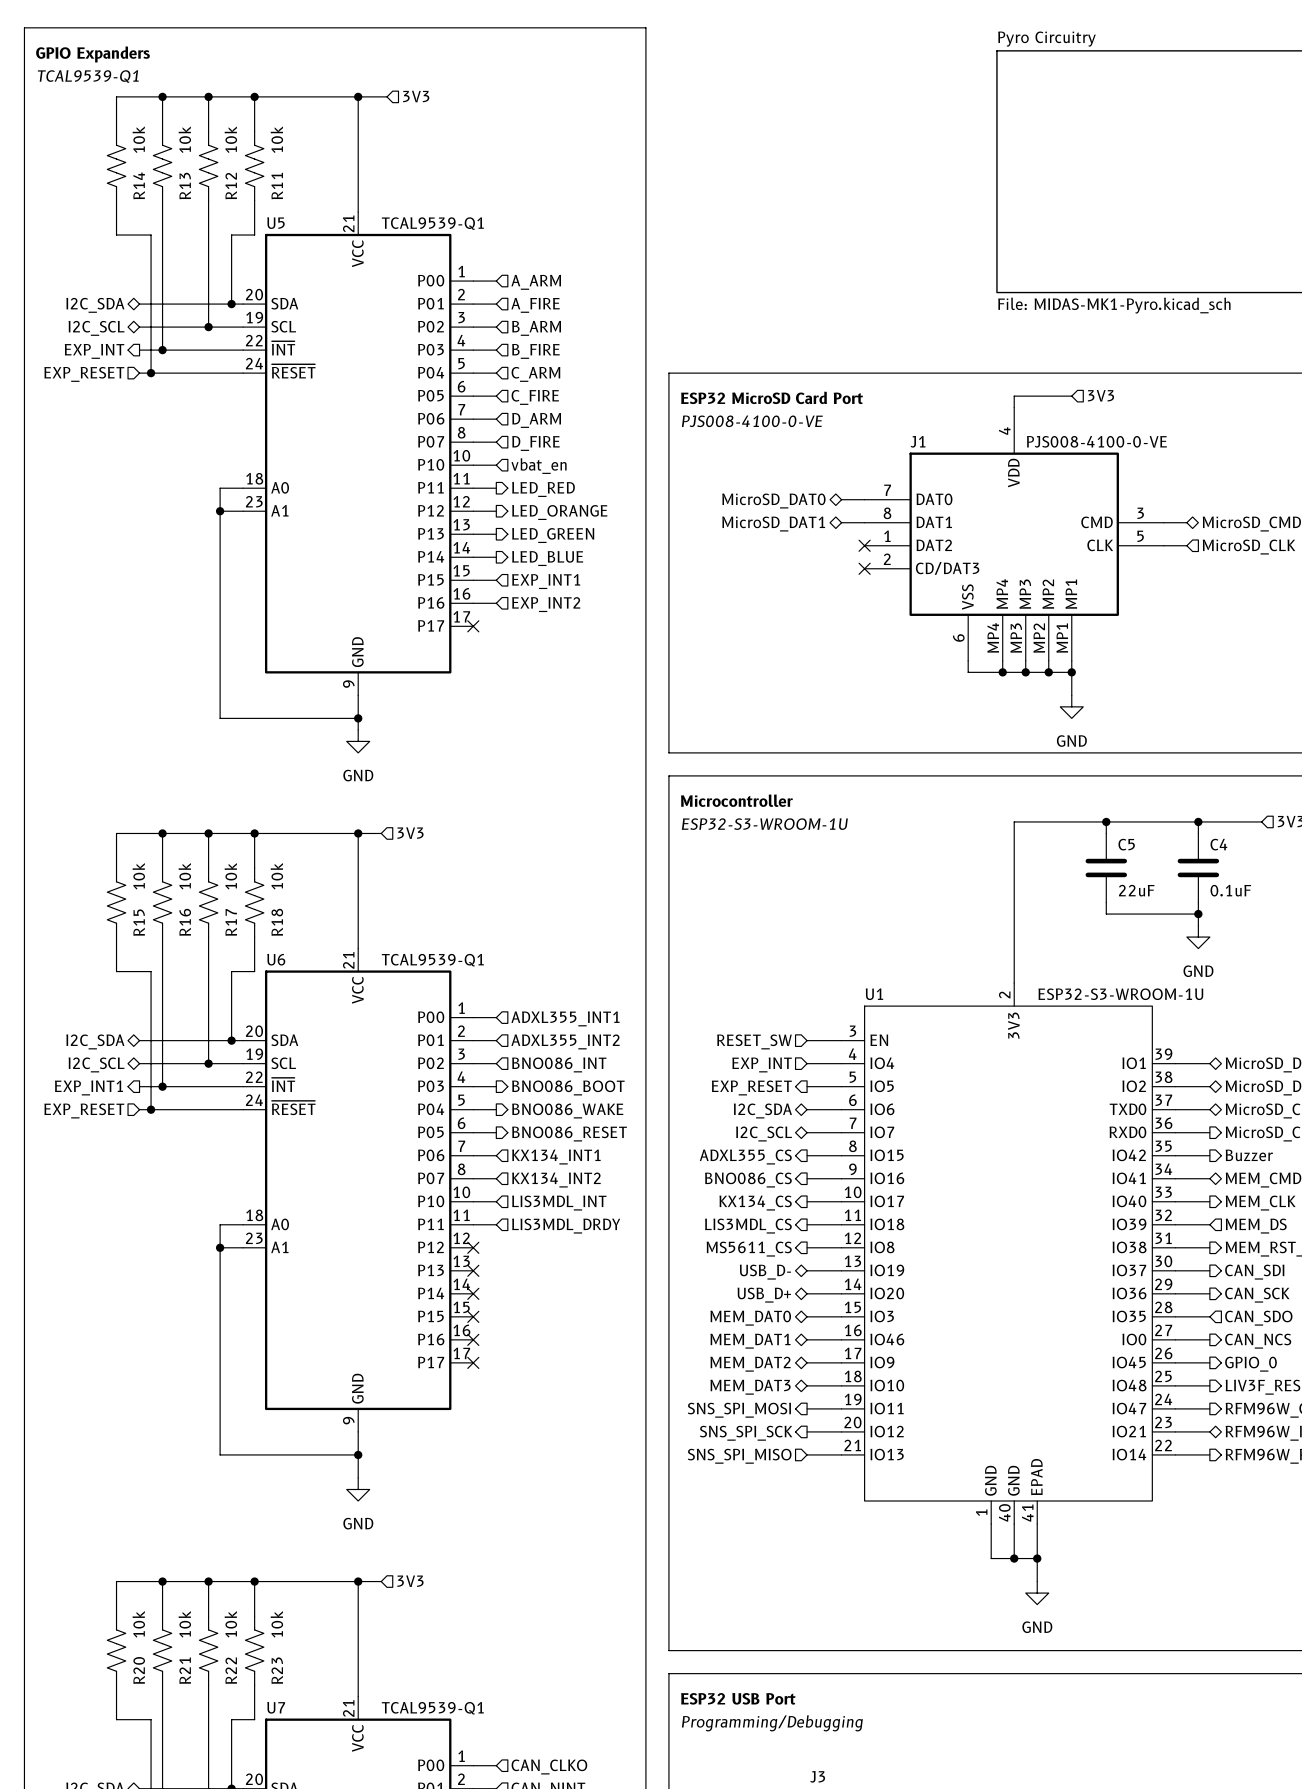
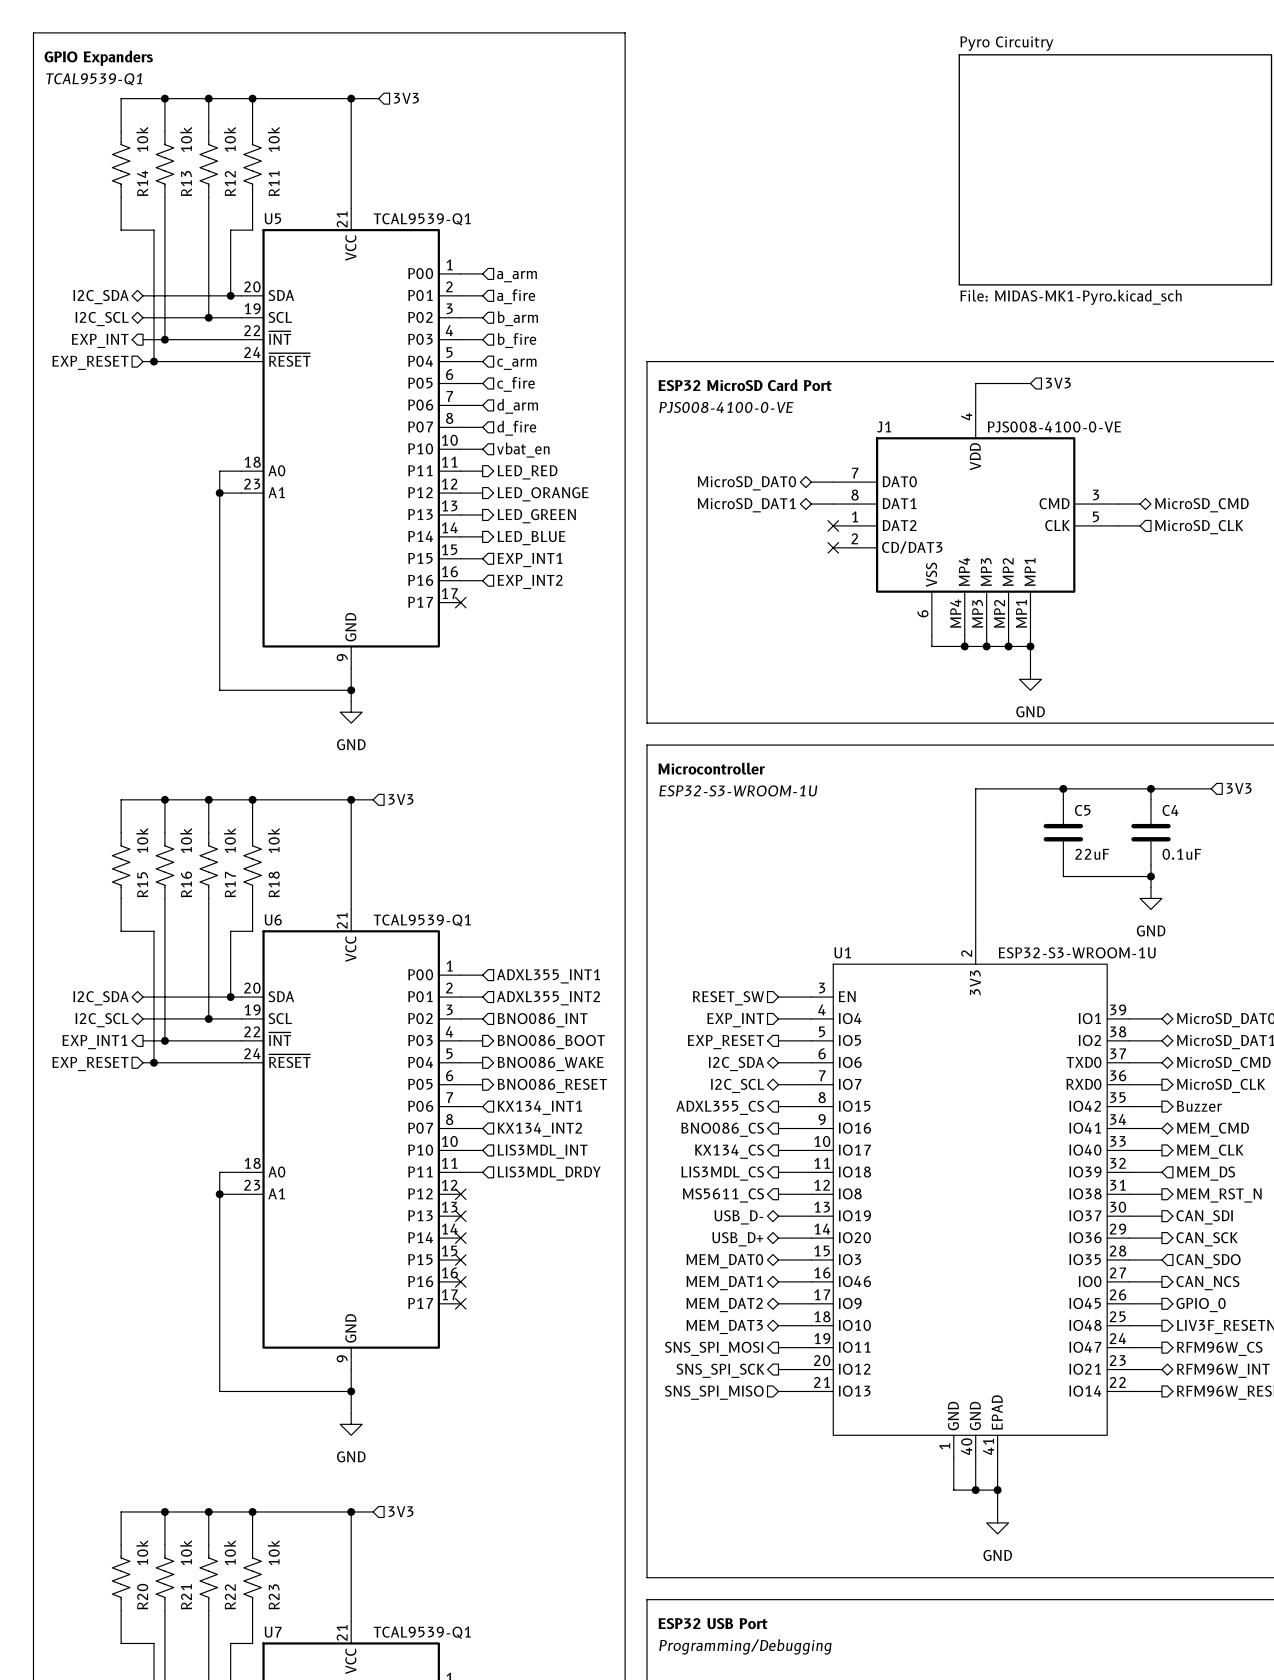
hierarchical label: A_ARM (536, 282) -> a_arm (516, 276)
hierarchical label: A_FIRE (535, 305) -> a_fire (516, 296)
hierarchical label: B_ARM (536, 328) -> b_arm (517, 318)
hierarchical label: B_FIRE (535, 351) -> b_fire (517, 340)
hierarchical label: C_ARM (535, 374) -> c_arm (516, 364)
hierarchical label: C_FIRE (535, 397) -> c_fire (516, 384)
hierarchical label: D_ARM (536, 420) -> d_arm (517, 406)
hierarchical label: D_FIRE (535, 443) -> d_fire (516, 428)

